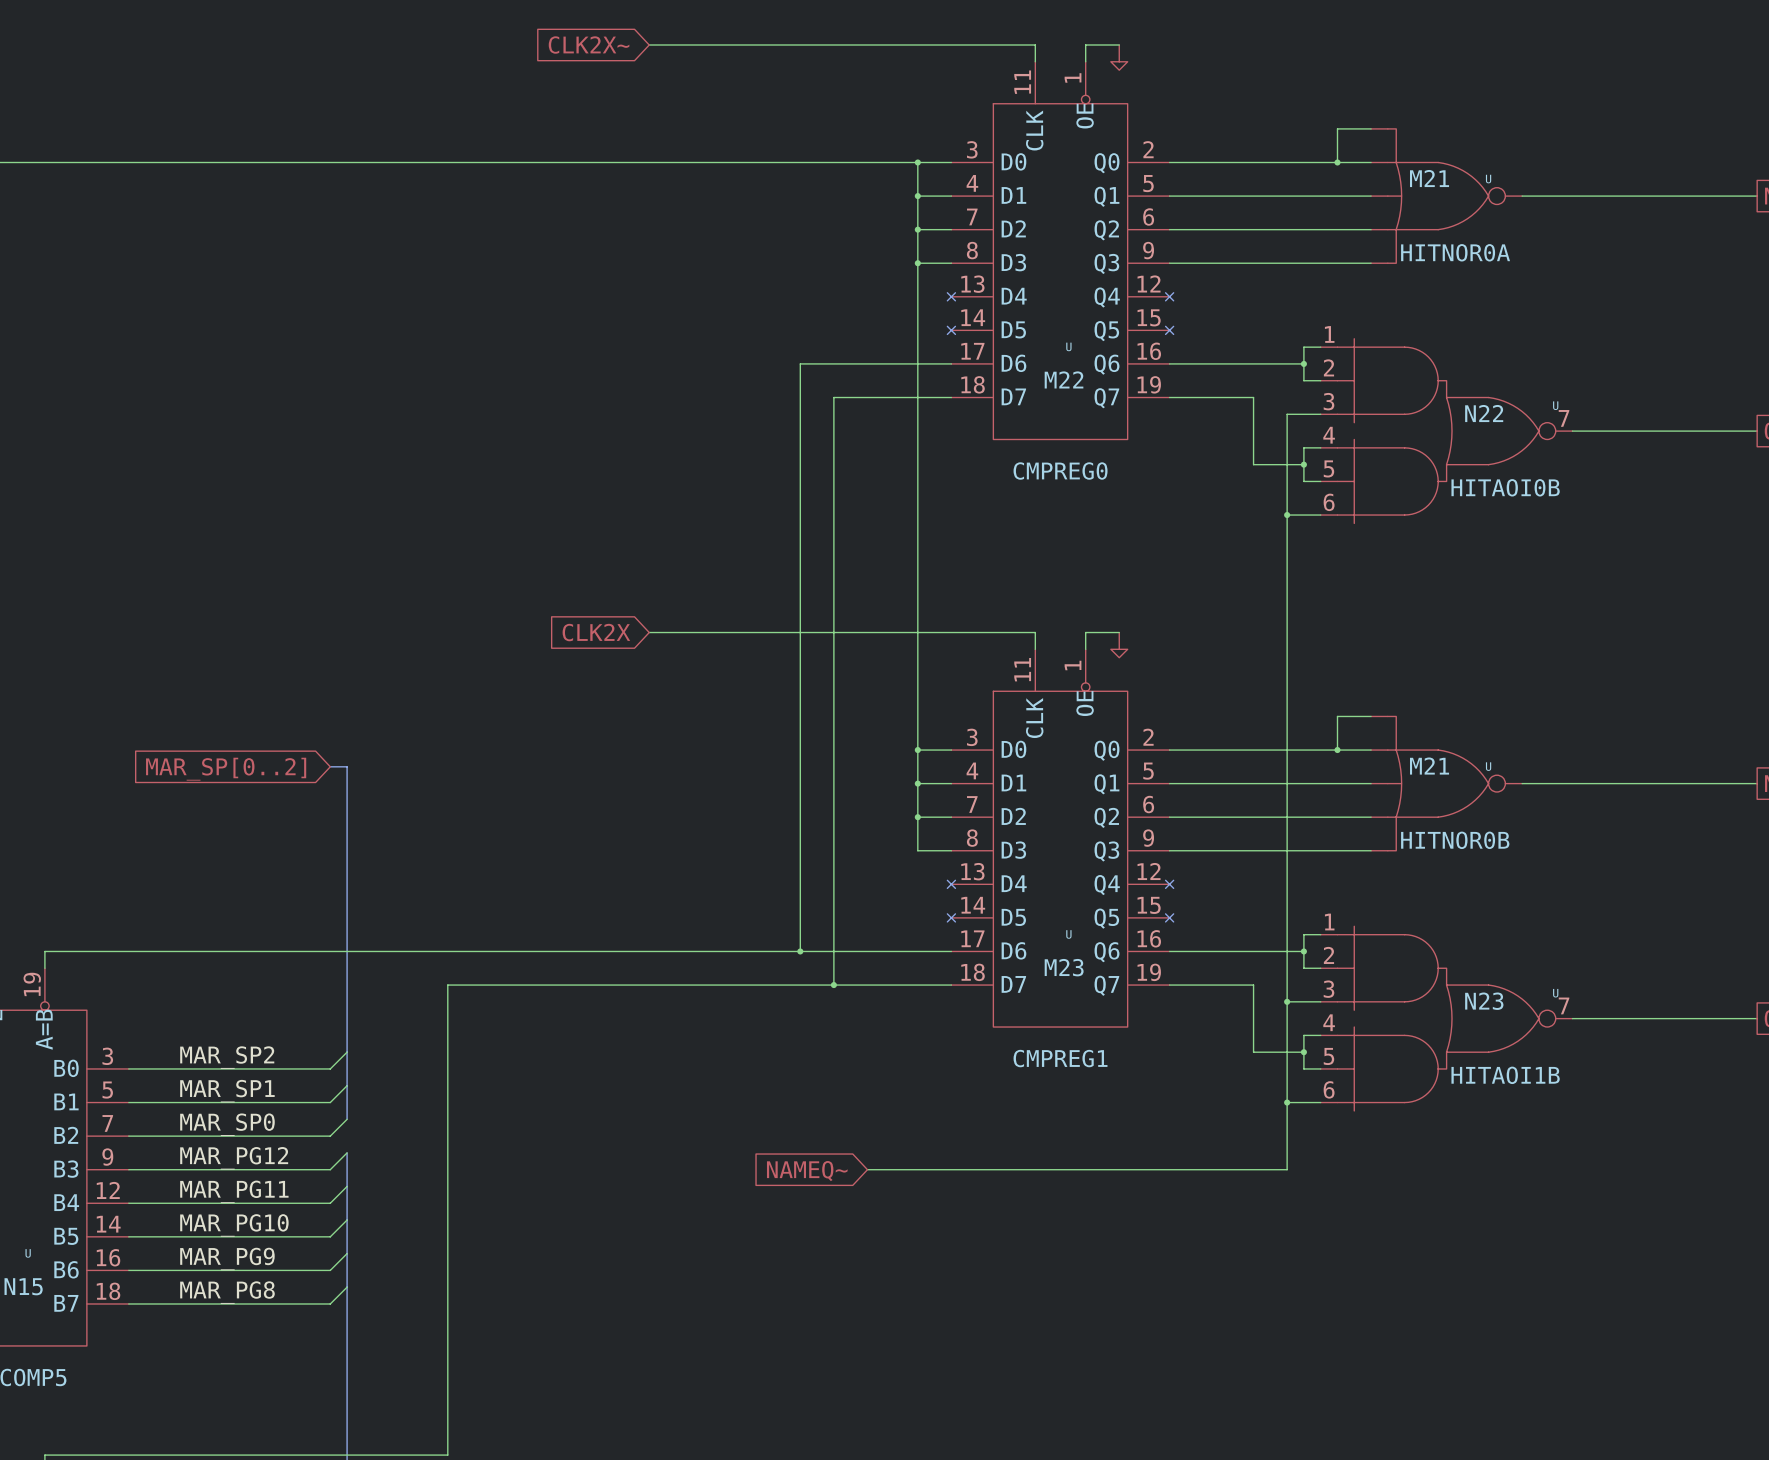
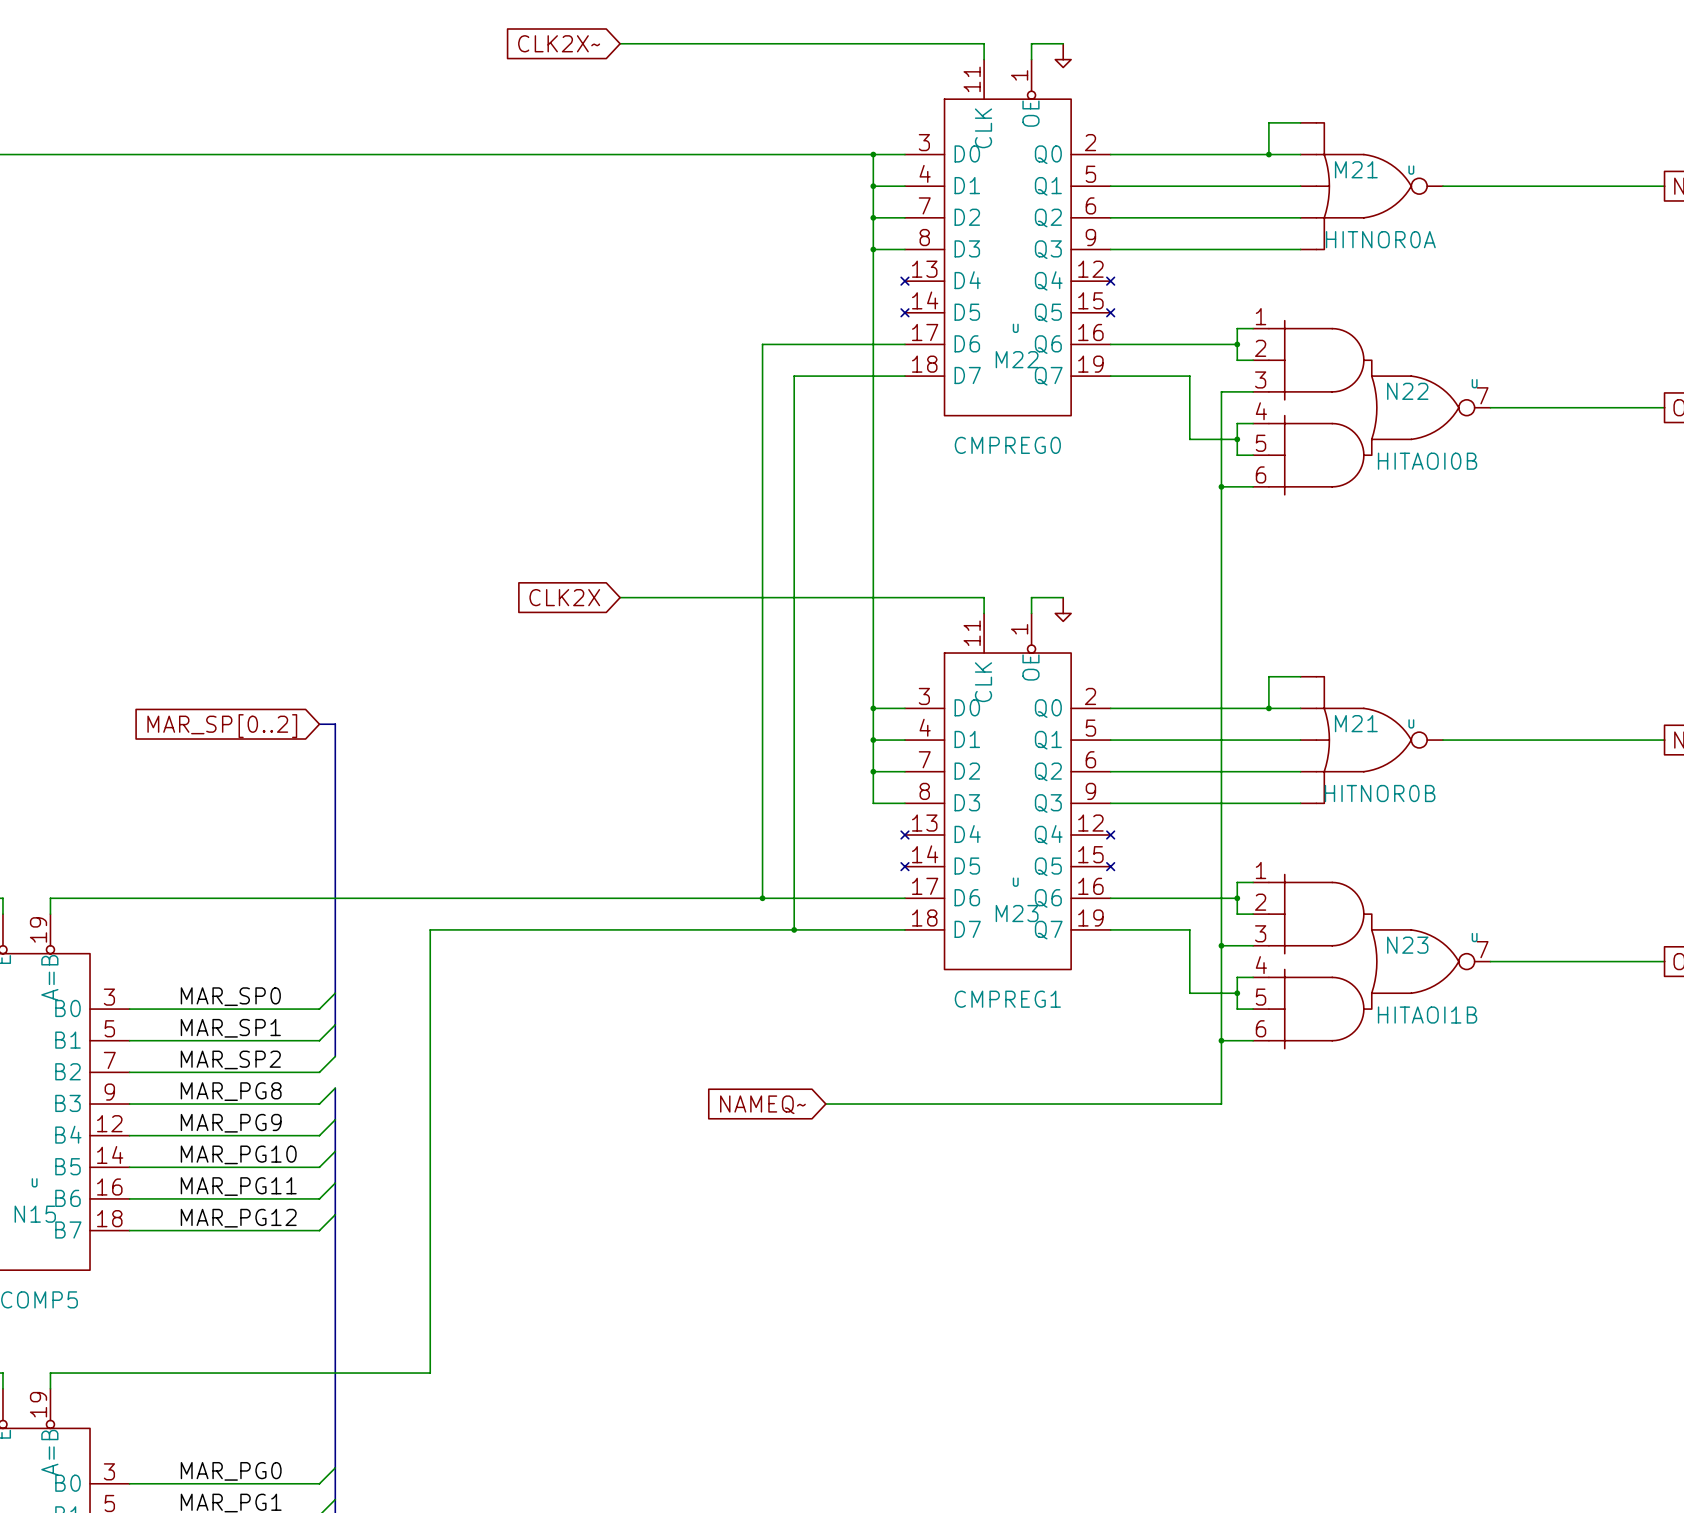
label: MAR_SP2 (227, 1057) -> MAR_SP0 (230, 996)
label: MAR_SP0 (227, 1124) -> MAR_SP2 (230, 1059)
label: MAR_PG12 (234, 1158) -> MAR_PG8 (231, 1091)
label: MAR_PG11 (234, 1191) -> MAR_PG9 (231, 1123)
label: MAR_PG9 (227, 1259) -> MAR_PG11 (238, 1186)
label: MAR_PG8 (227, 1292) -> MAR_PG12 (238, 1218)

